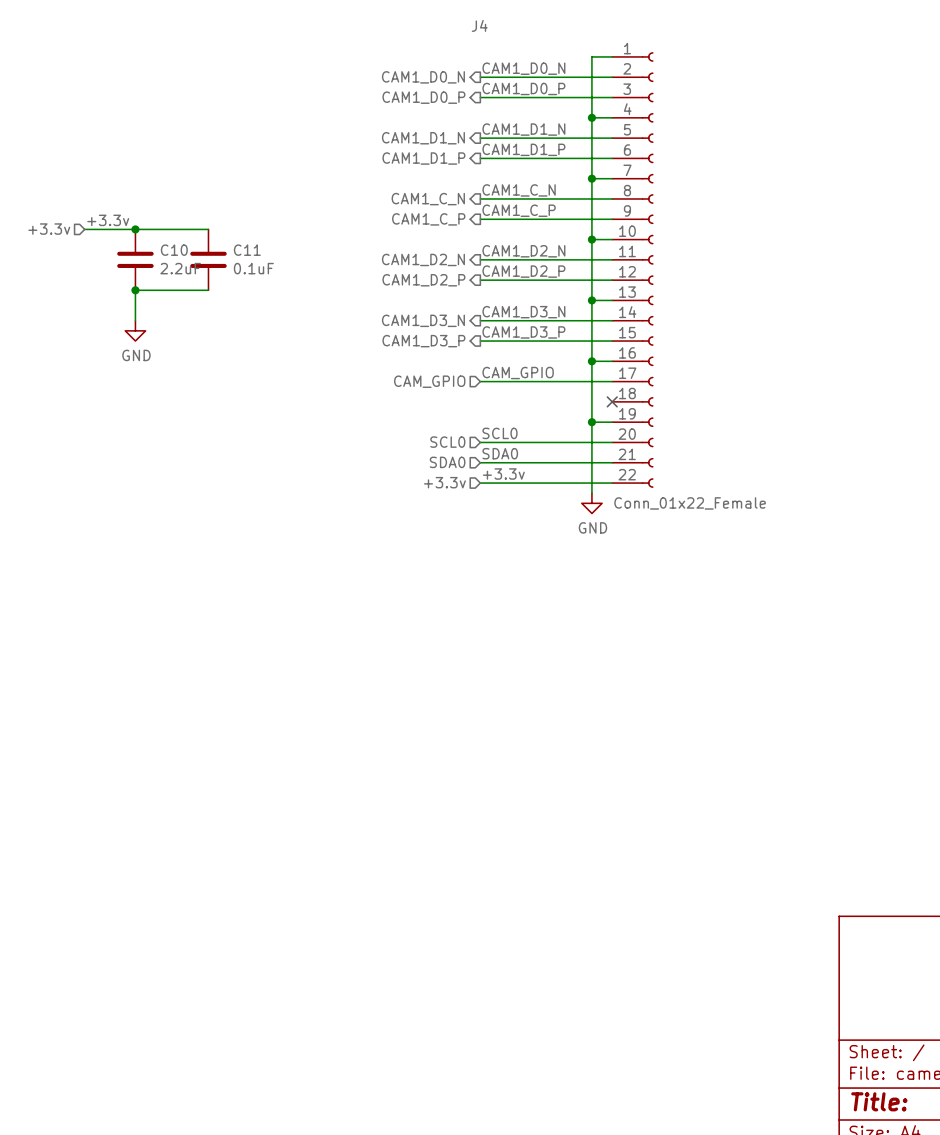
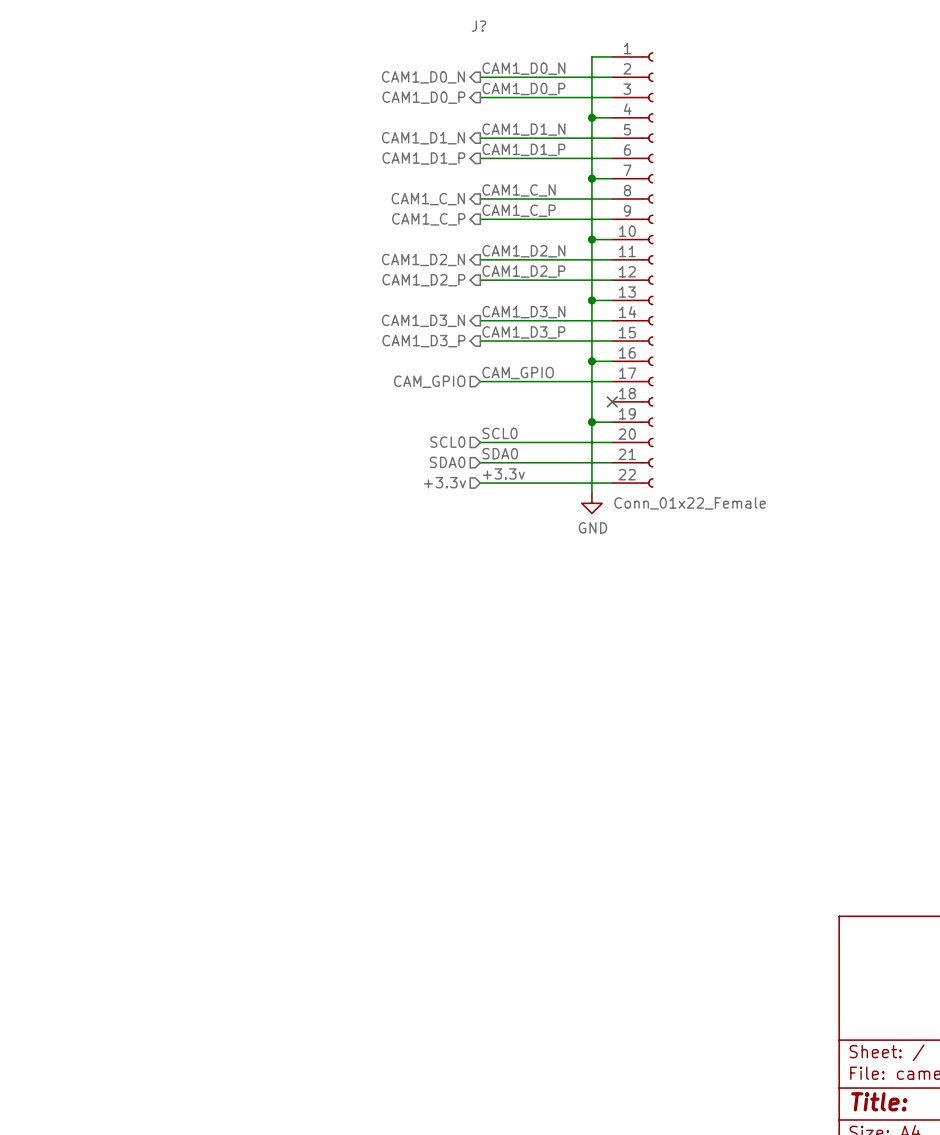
J4 name: J4 (479, 25) -> J? (478, 26)
label: +3.3v (108, 220) -> none
hierarchical label: +3.3v (49, 229) -> none
wire: (84, 229) (208, 229) -> none
junction: (135, 229) -> none
C10: 2.2uF (135, 259) -> none
C11: 0.1uF (208, 259) -> none
junction: (135, 290) -> none
wire: (208, 290) (135, 290) (135, 320) -> none
power symbol: GND (135, 330) -> none

